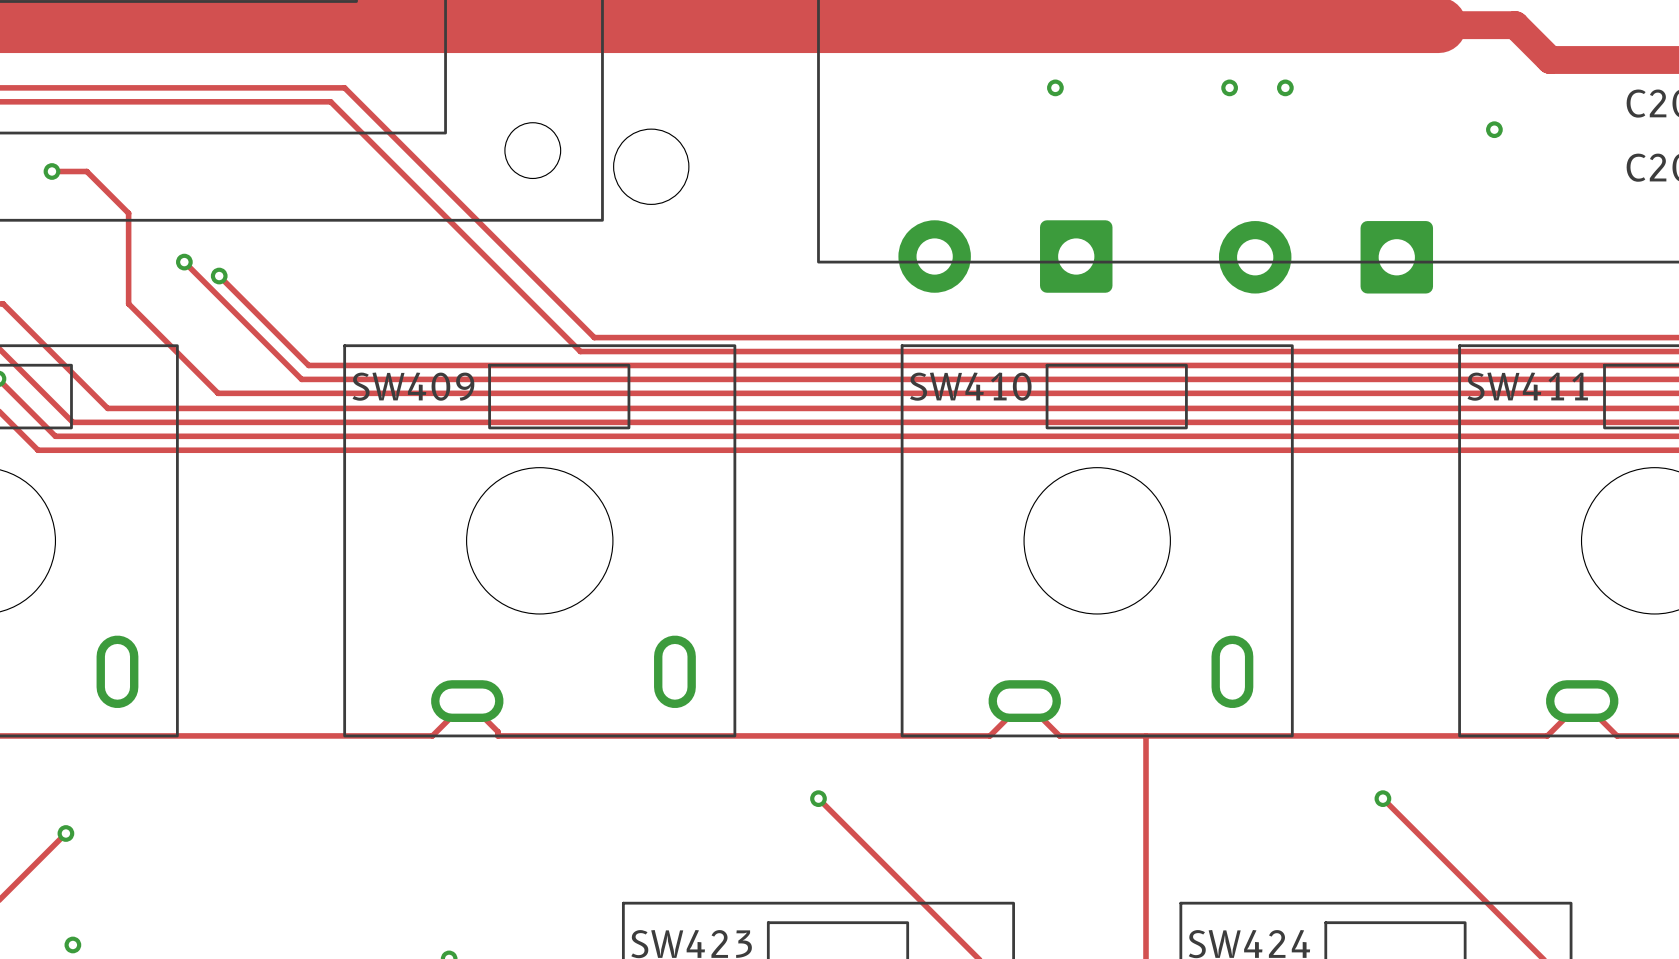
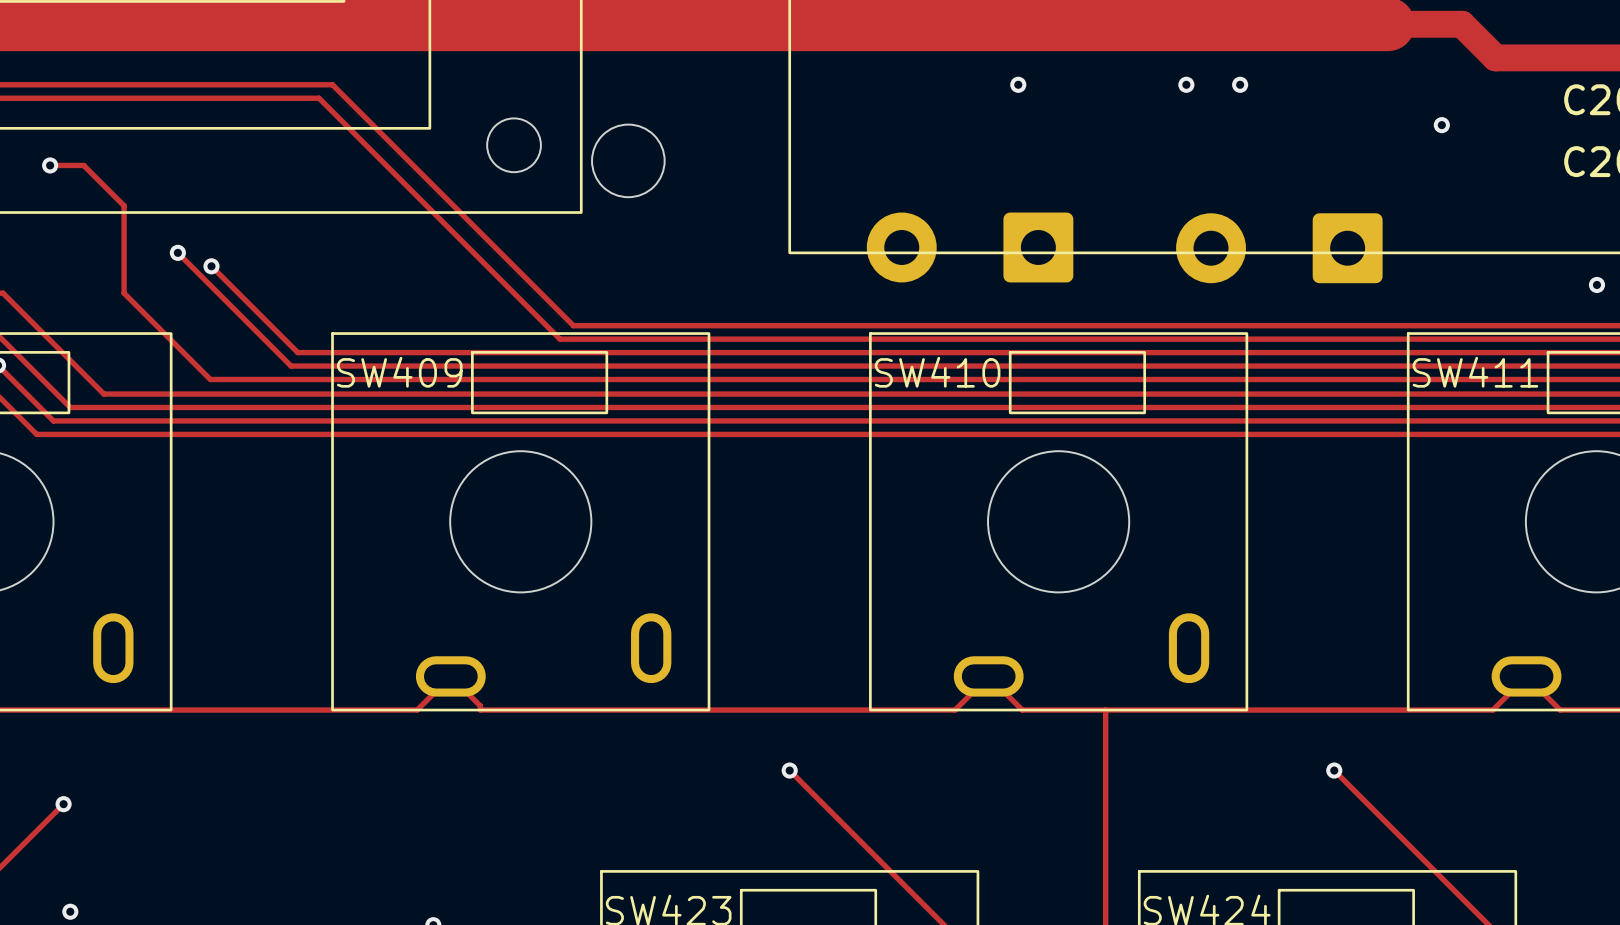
via: none -> (1596, 284)

